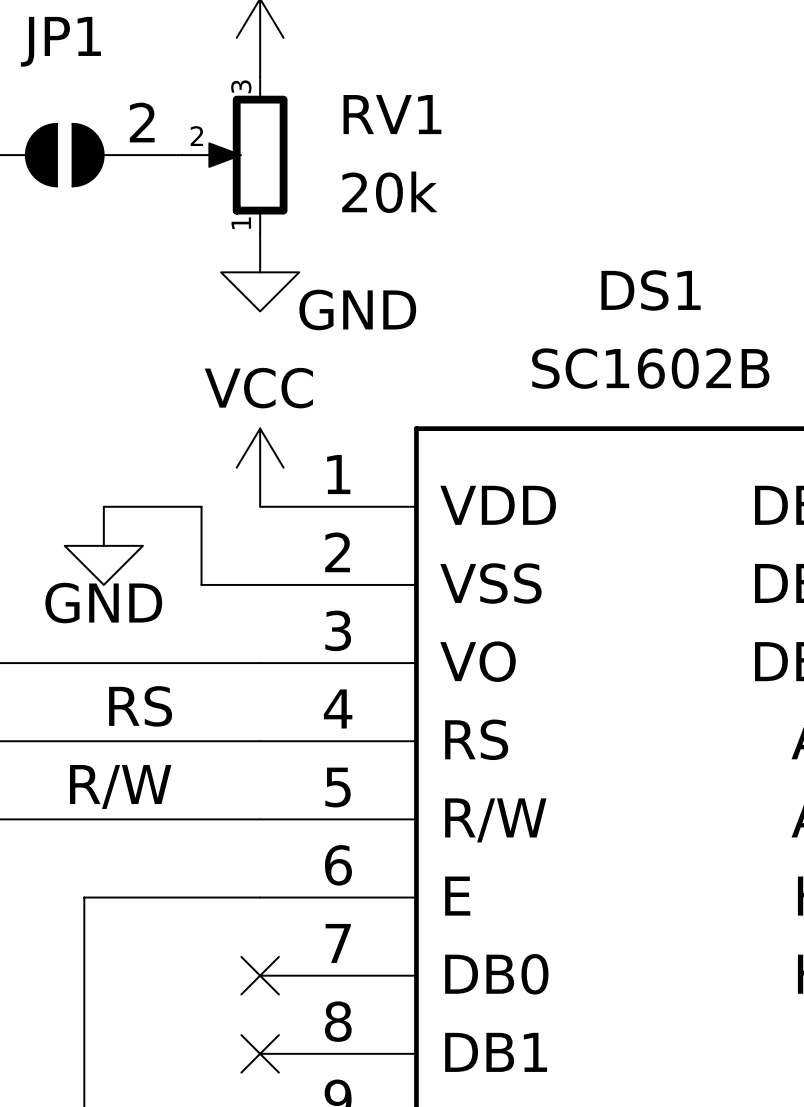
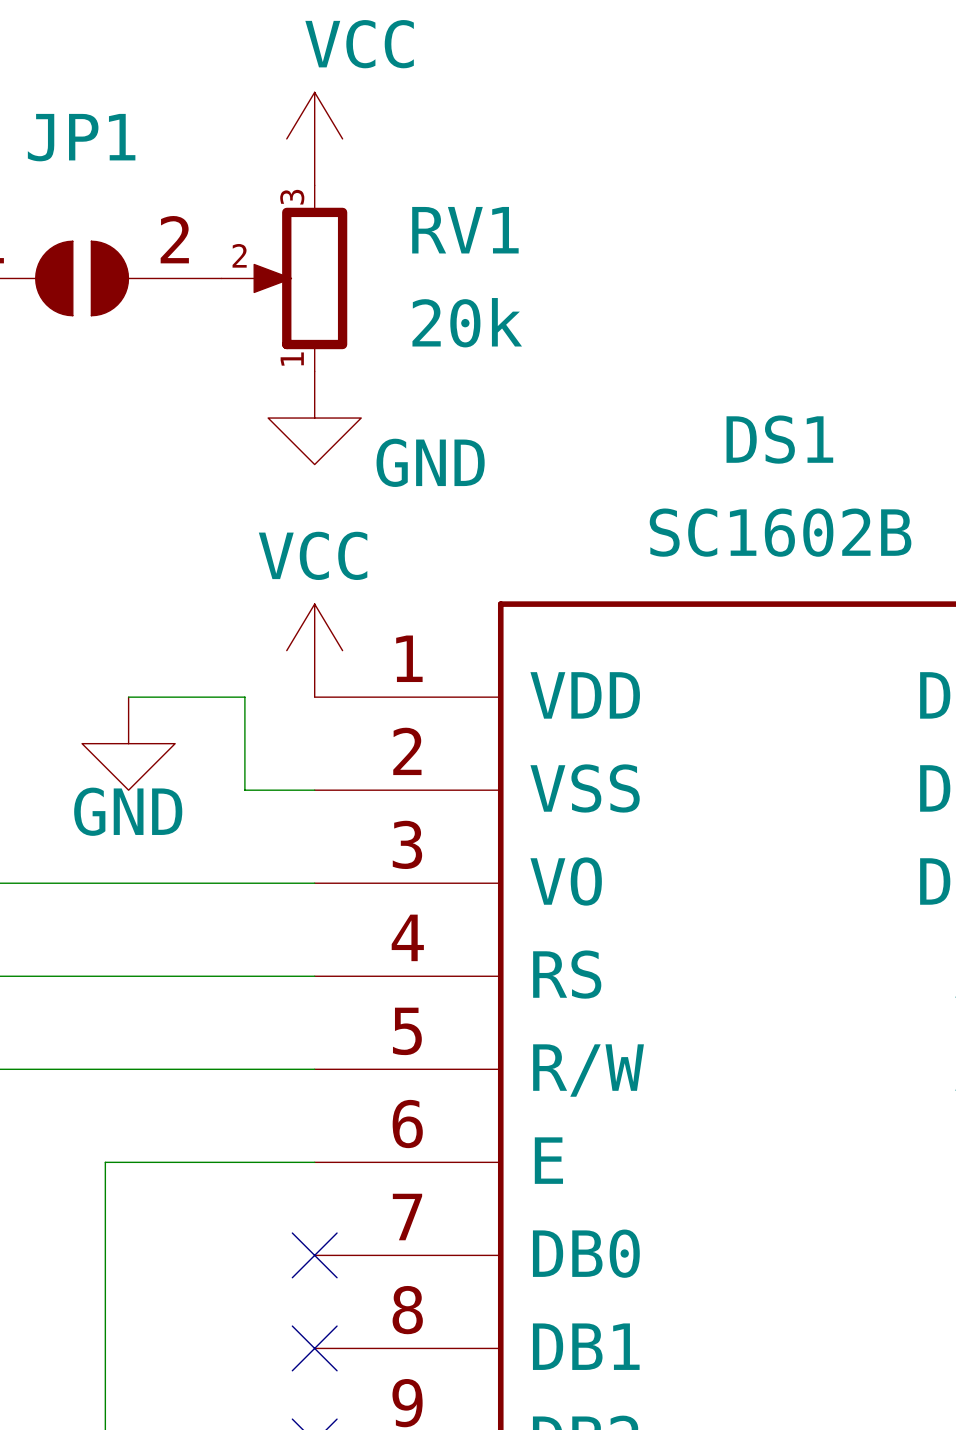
label: RS (140, 706) -> none
label: R/W (120, 787) -> none

